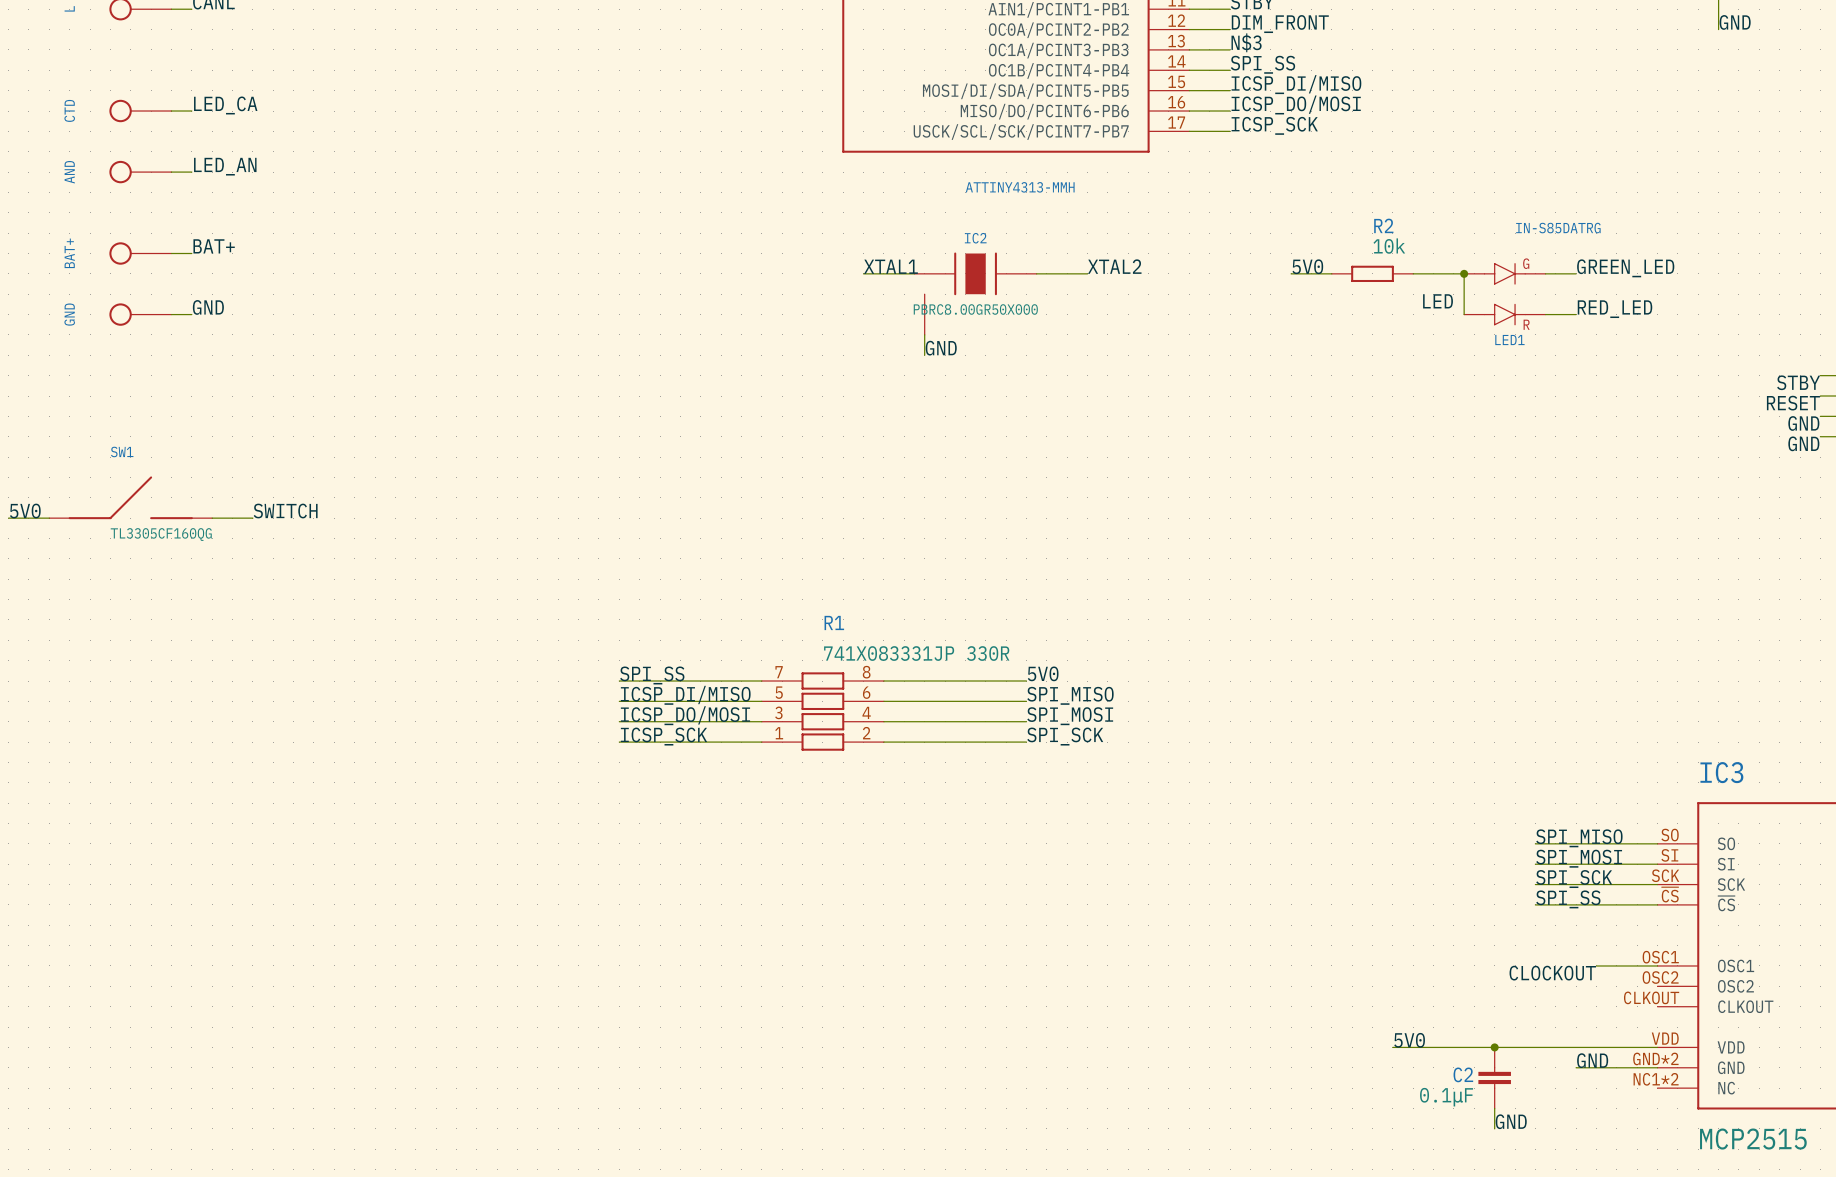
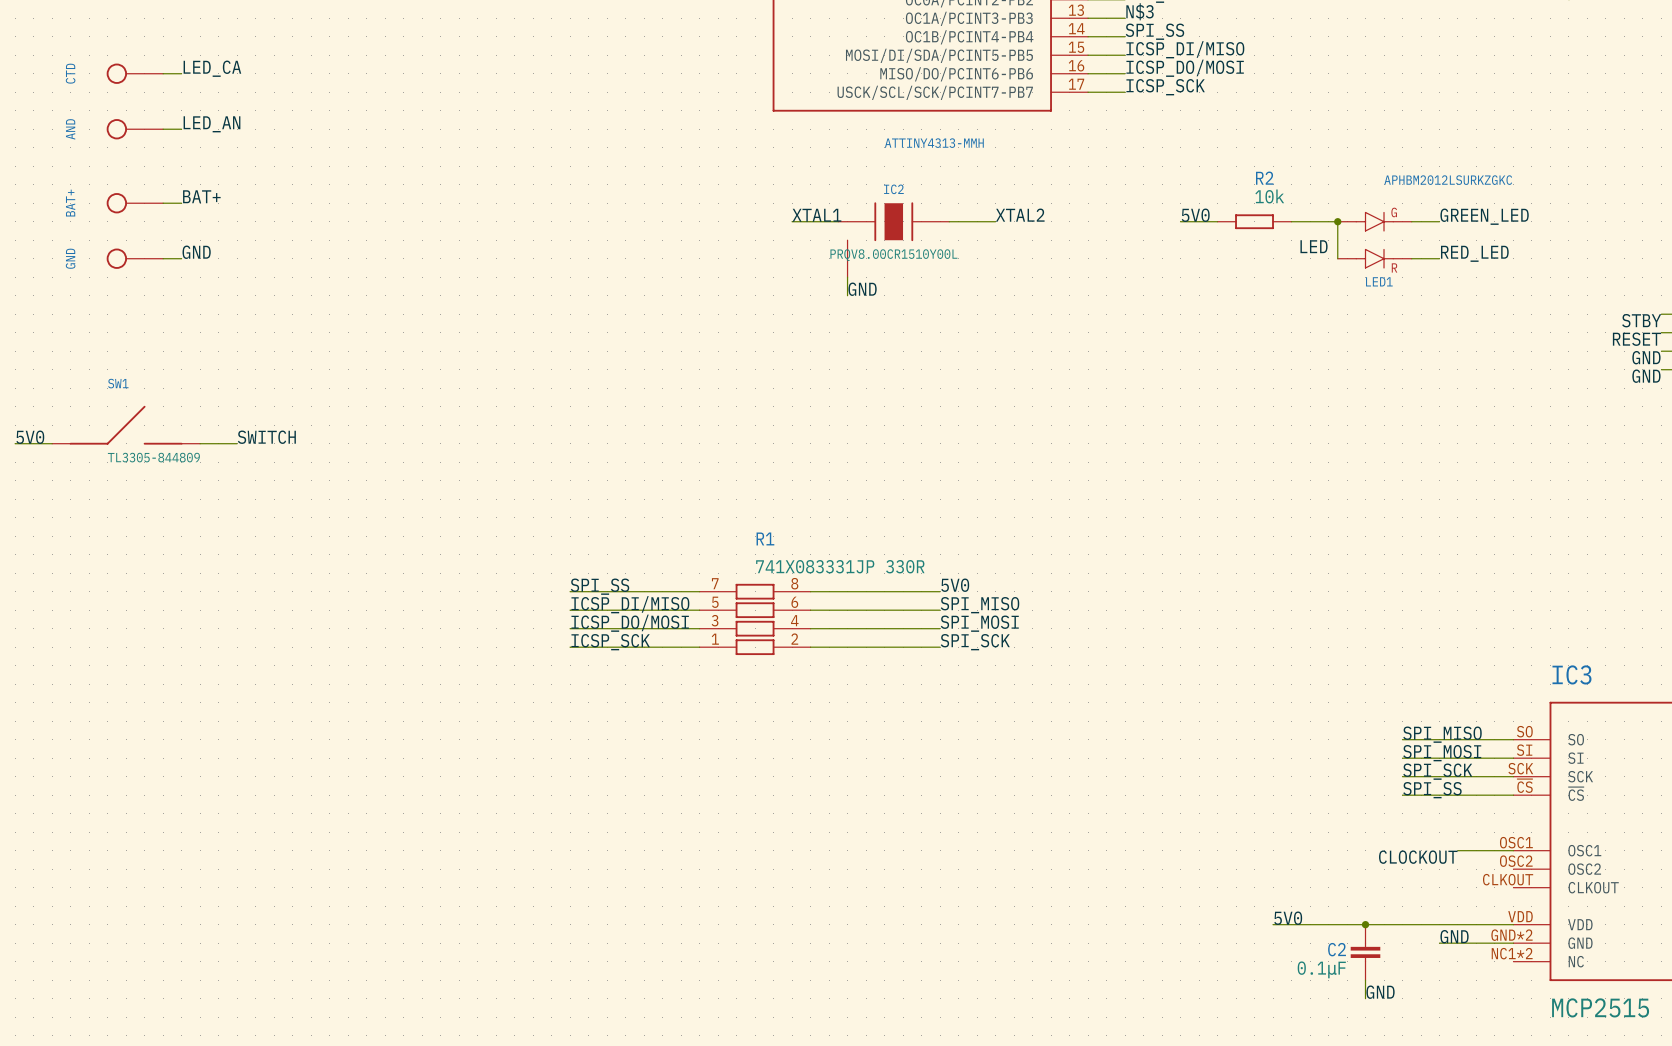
LED1 value: IN-S85DATRG (1558, 228) -> APHBM2012LSURKZGKC (1448, 180)
IC2 value: PBRC8.00GR50X000 (975, 309) -> PRQV8.00CR1510Y00L (893, 255)
SW1 value: TL3305CF160QG (161, 534) -> TL3305-844809 (153, 457)

